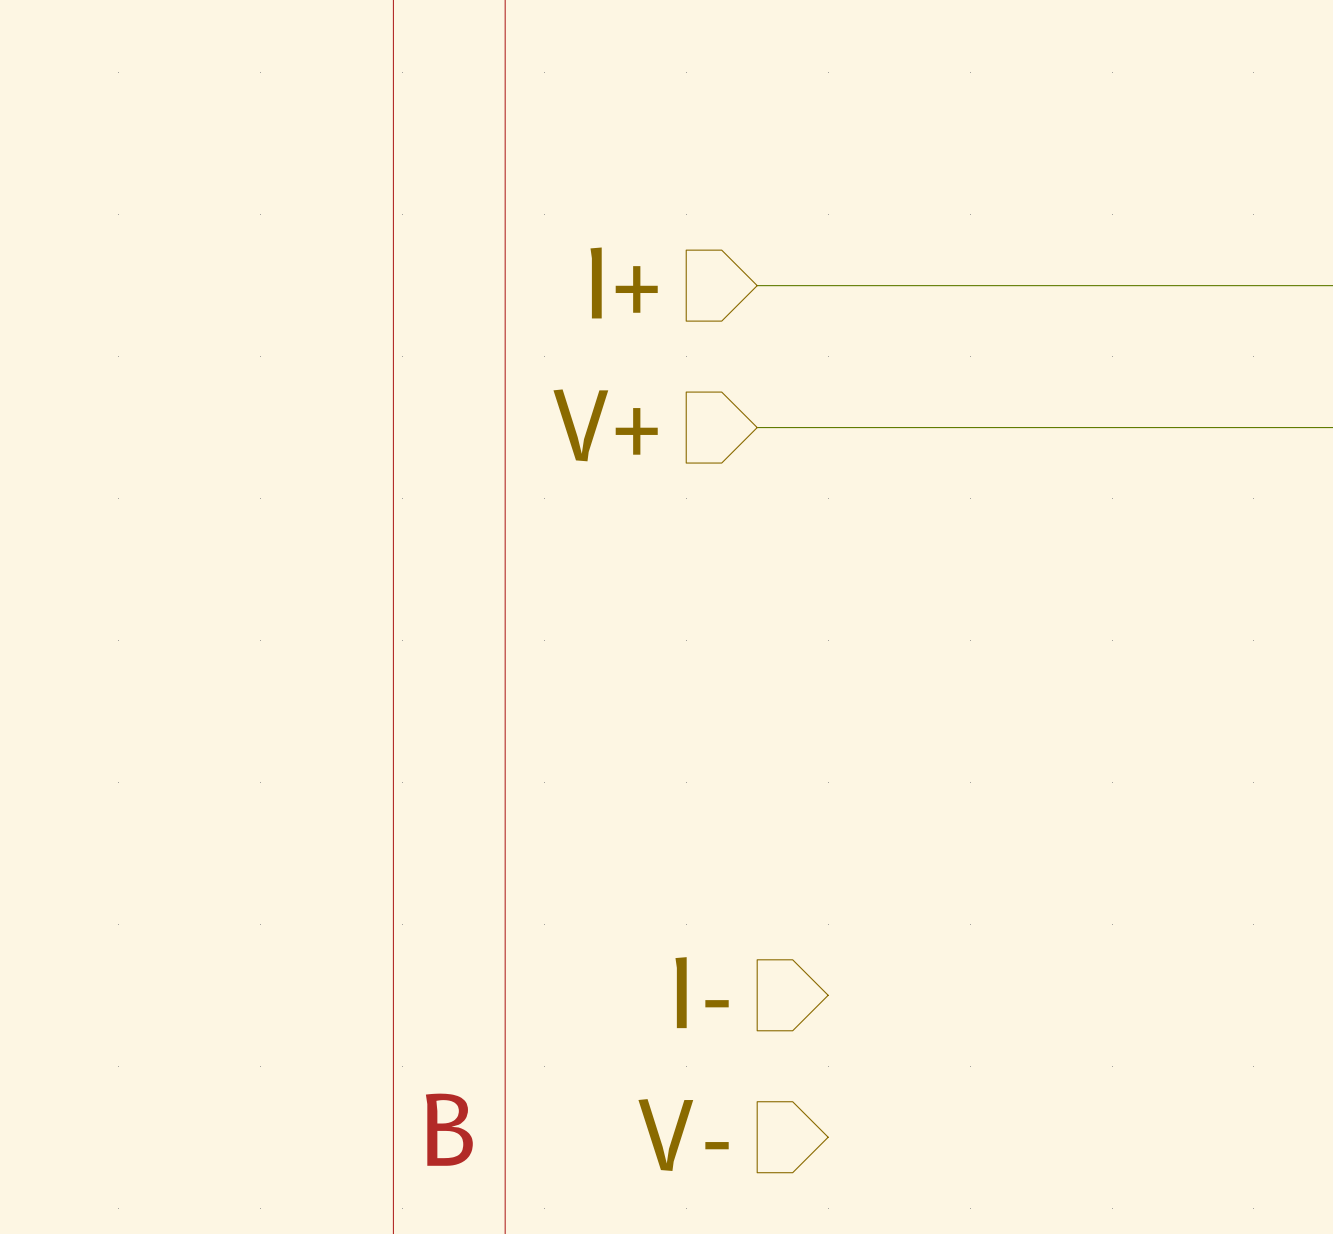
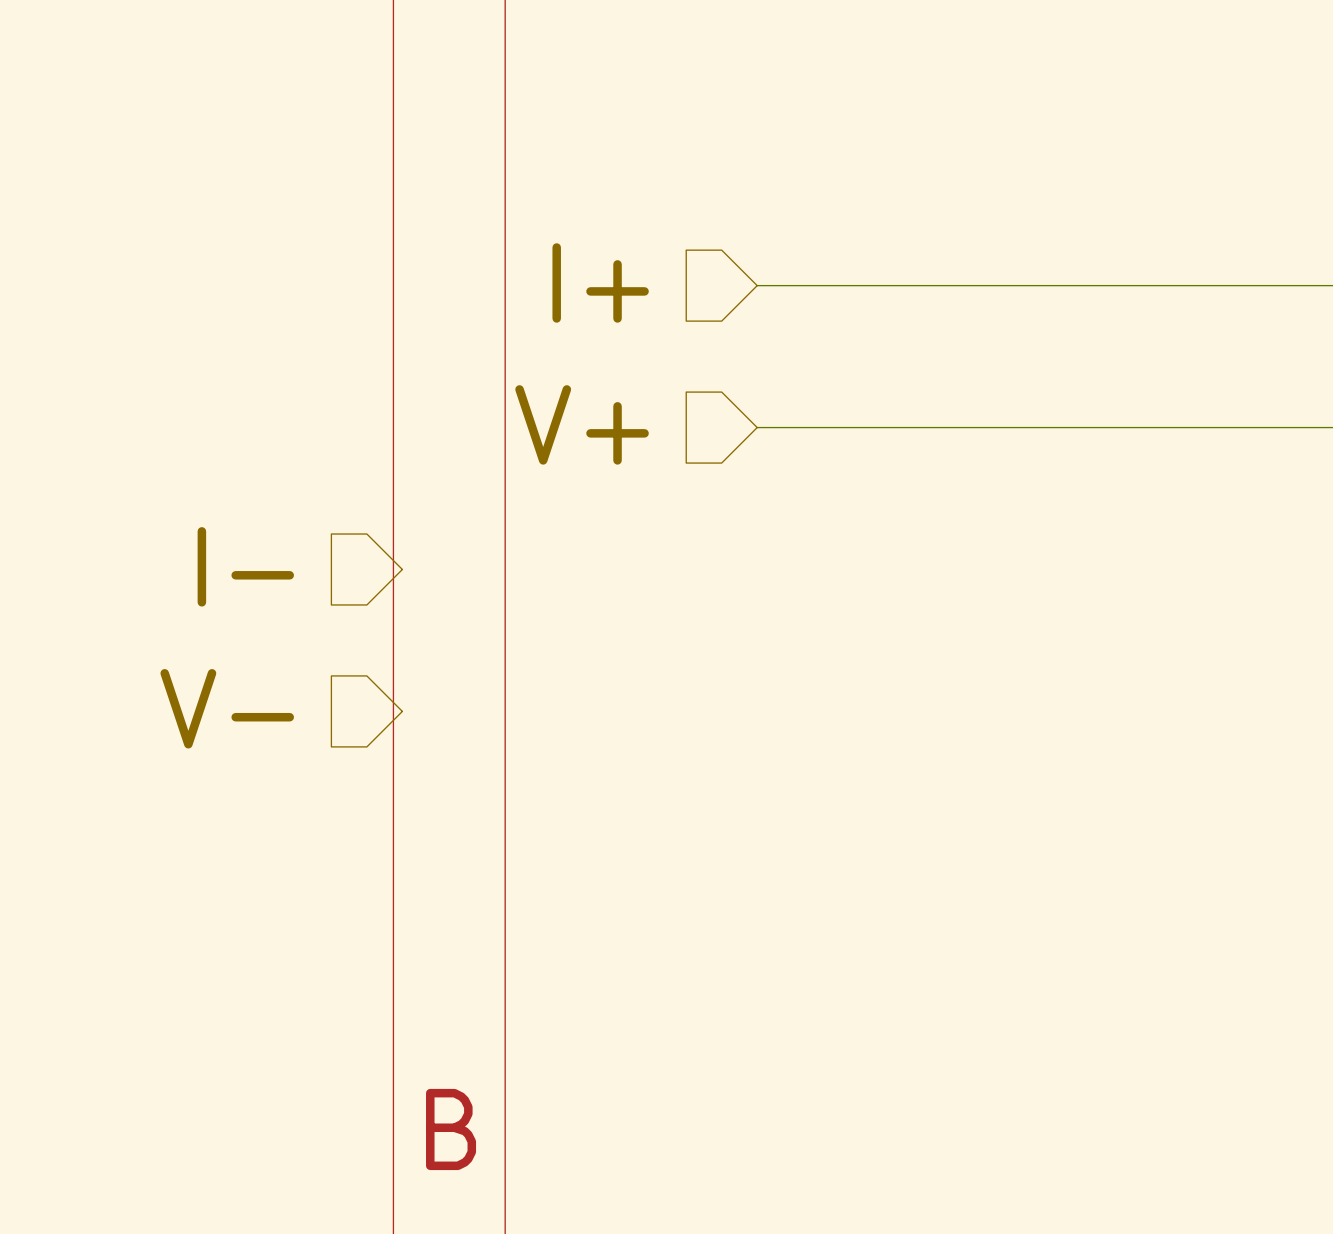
hierarchical label position: I- (702, 992) -> I- (245, 566)
hierarchical label position: V- (683, 1135) -> V- (227, 708)

